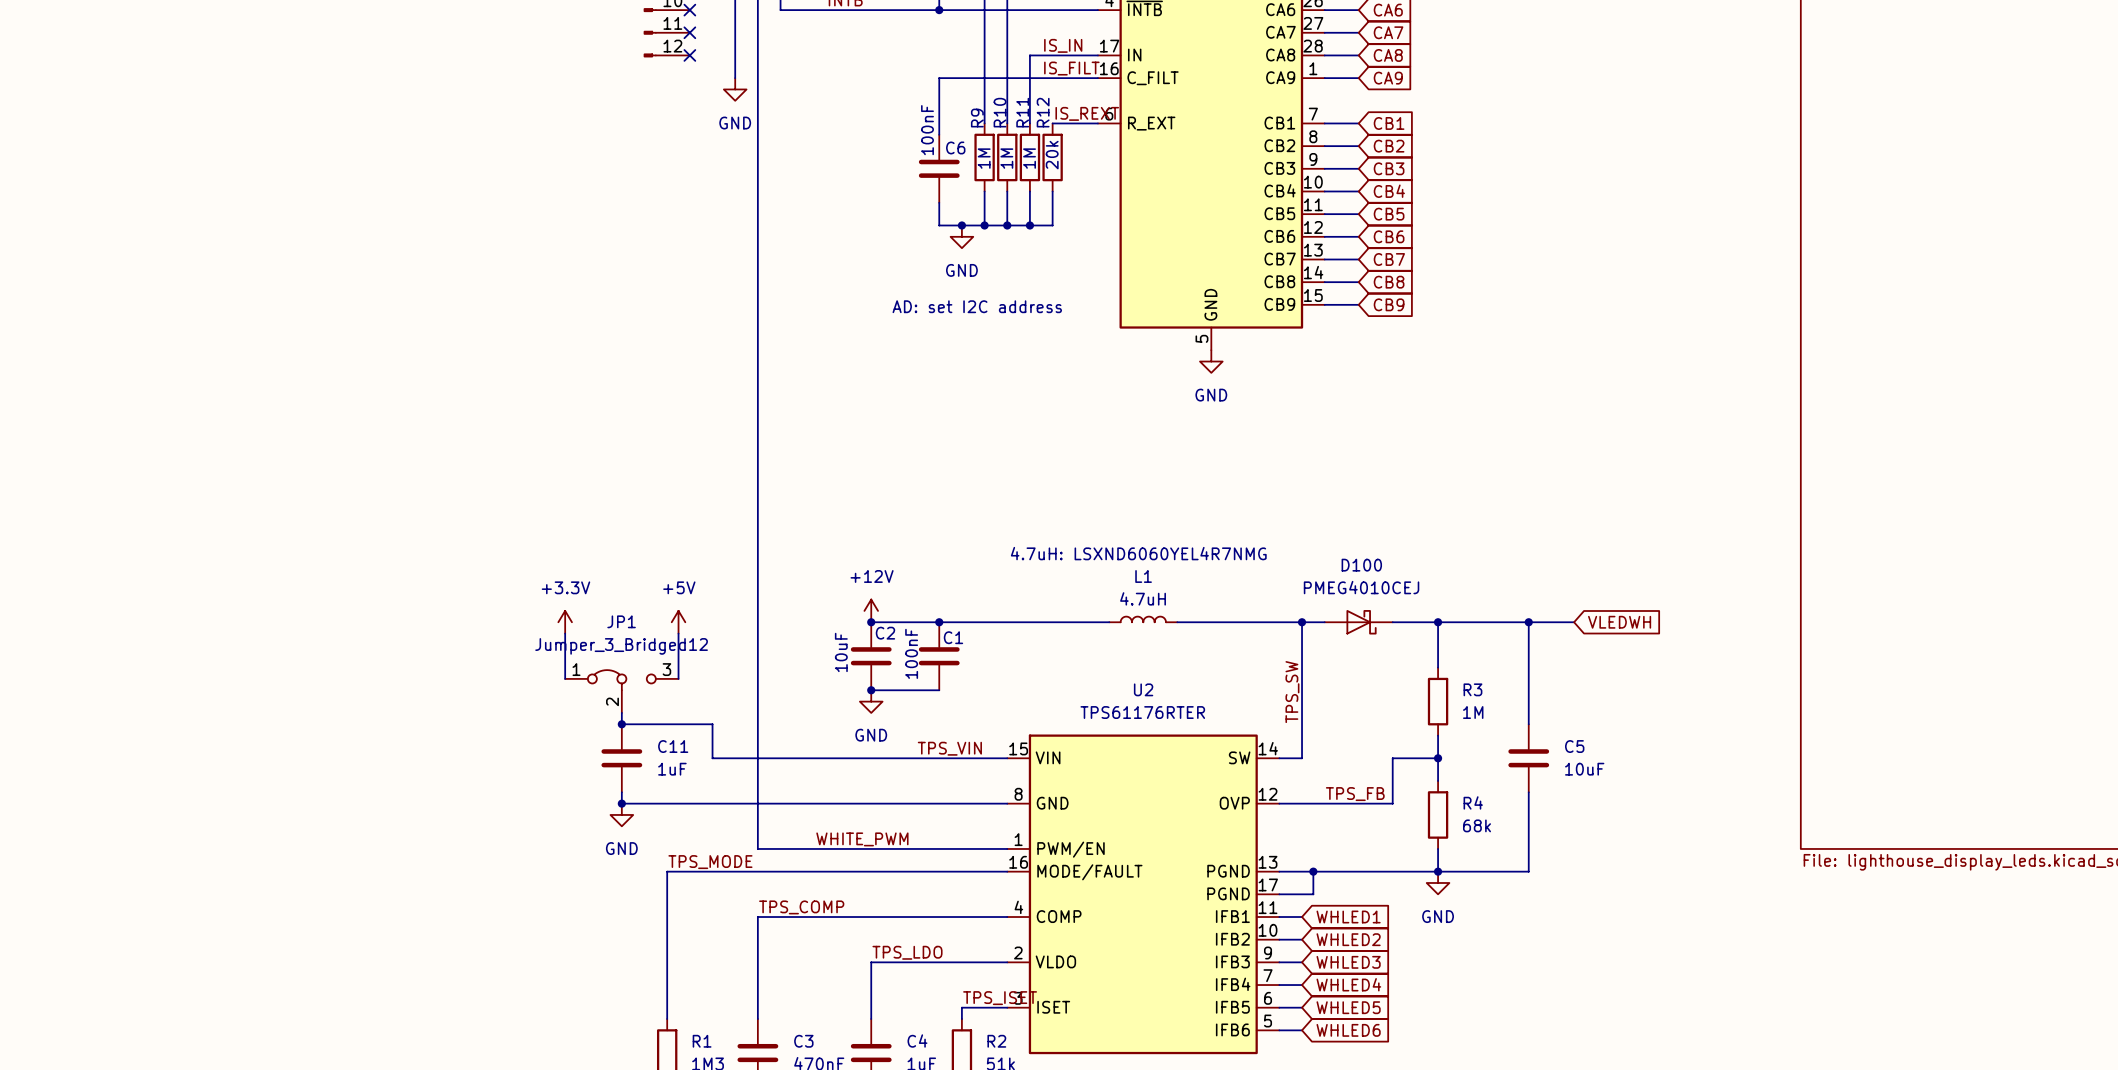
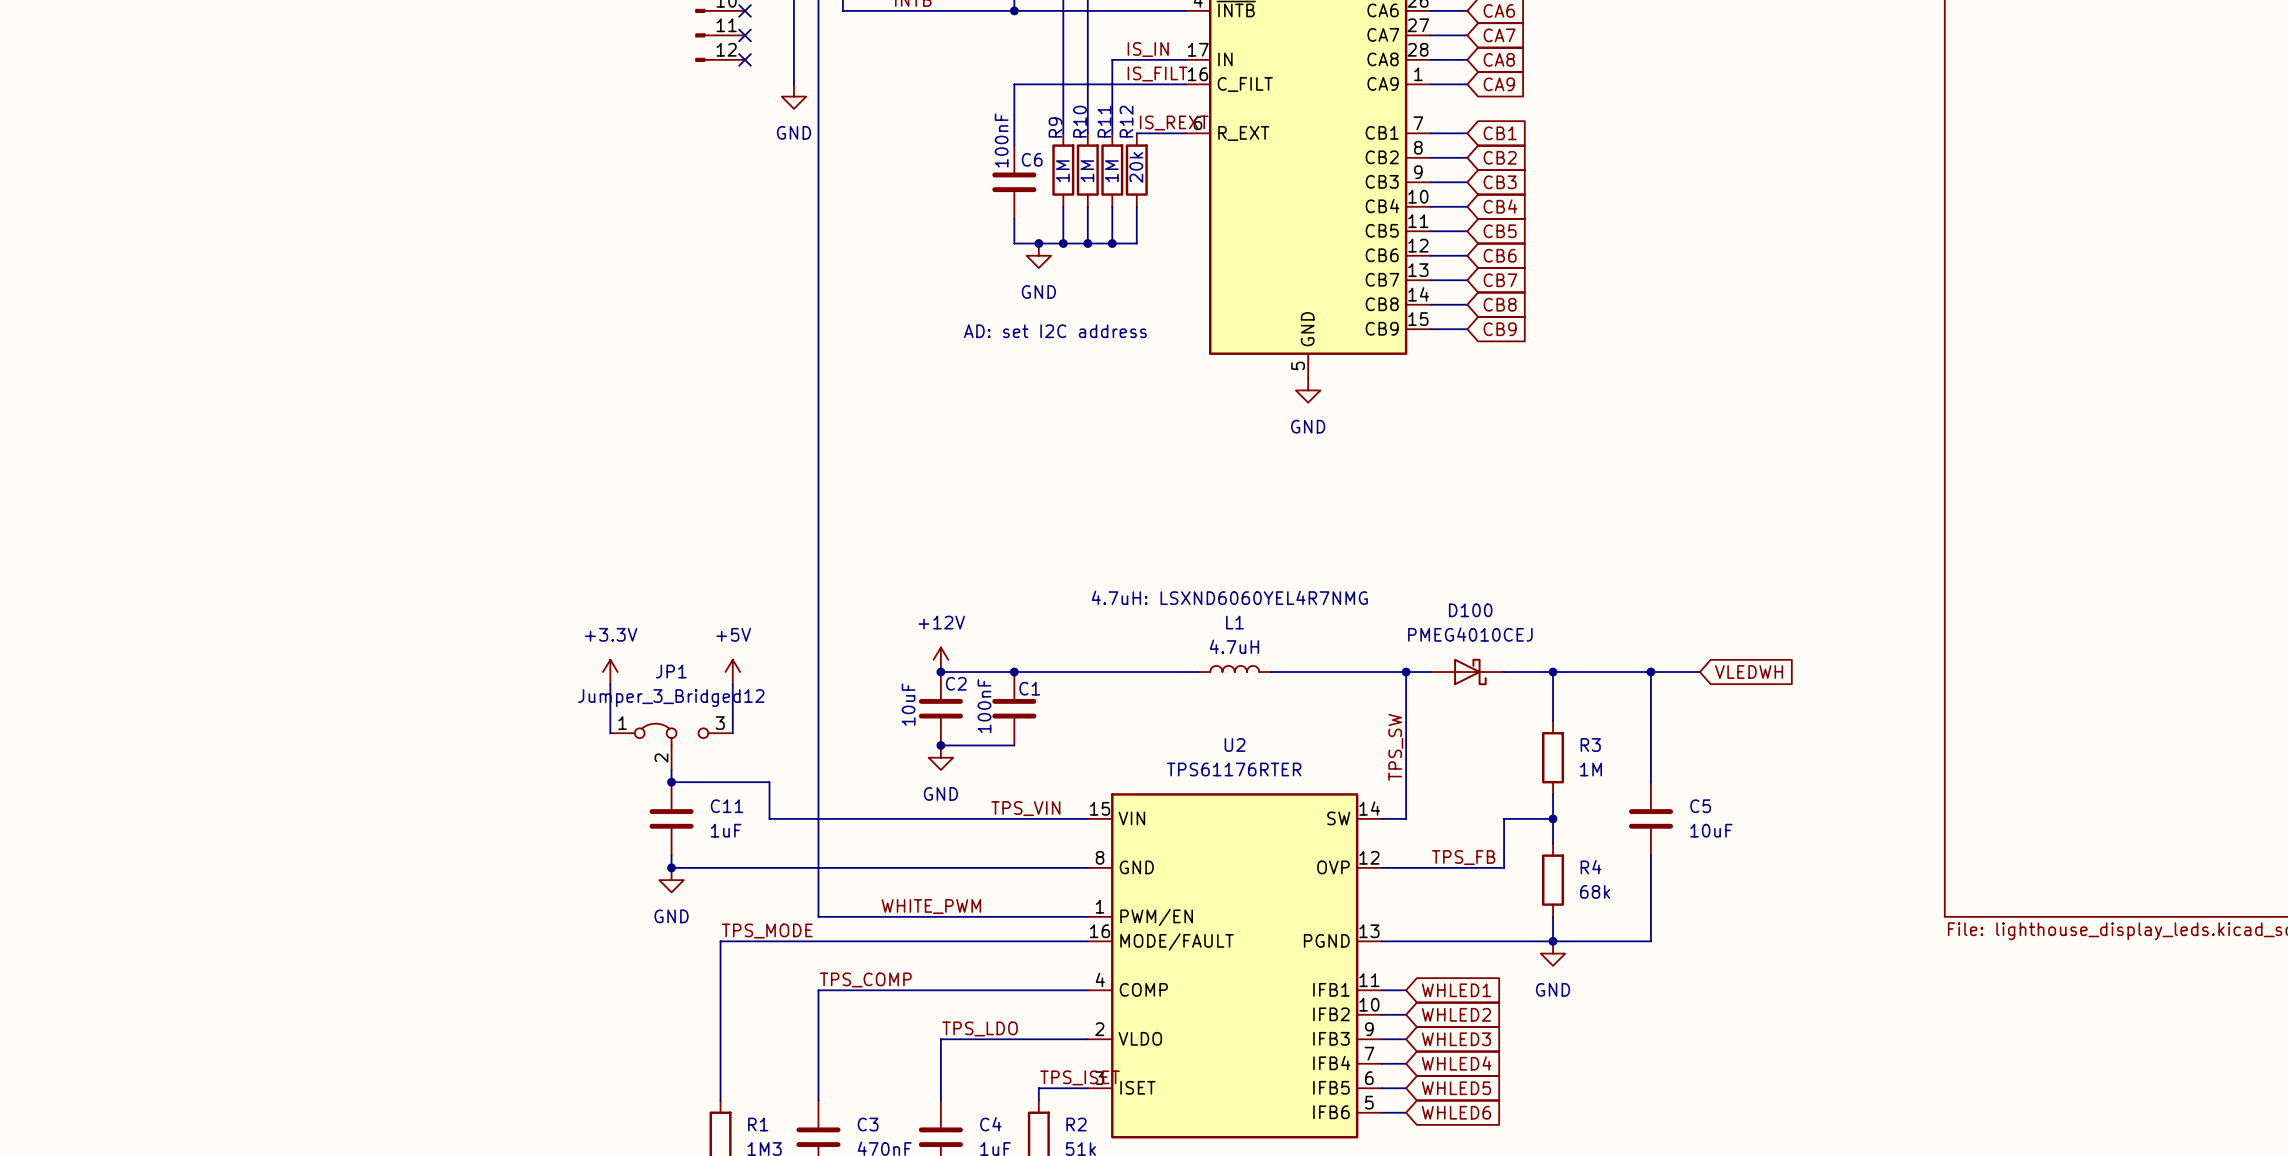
U2 symbol: [1007, 734, 1280, 1055] -> [1087, 793, 1382, 1139]
wire: (1313, 871) (1313, 894) (1279, 894) -> none
junction: (1313, 871) -> none

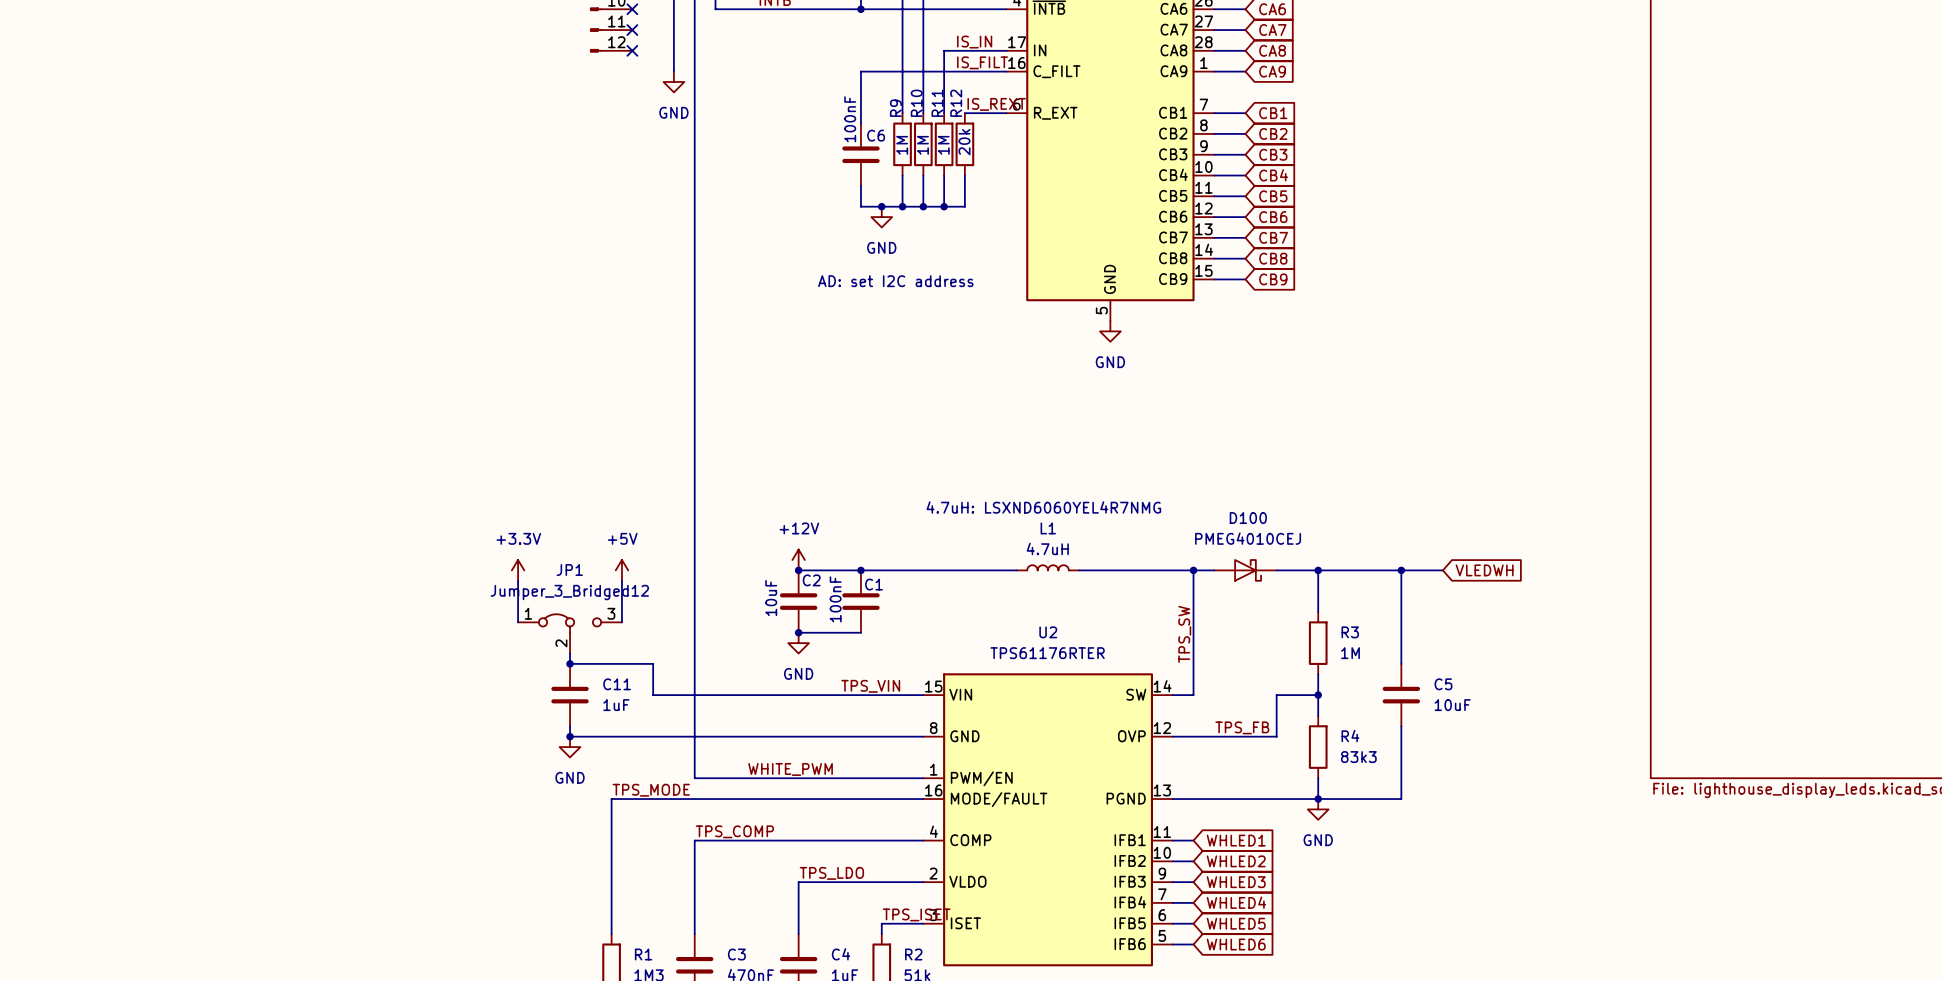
R4 value: 68k (1595, 891) -> 83k3 (1358, 757)

